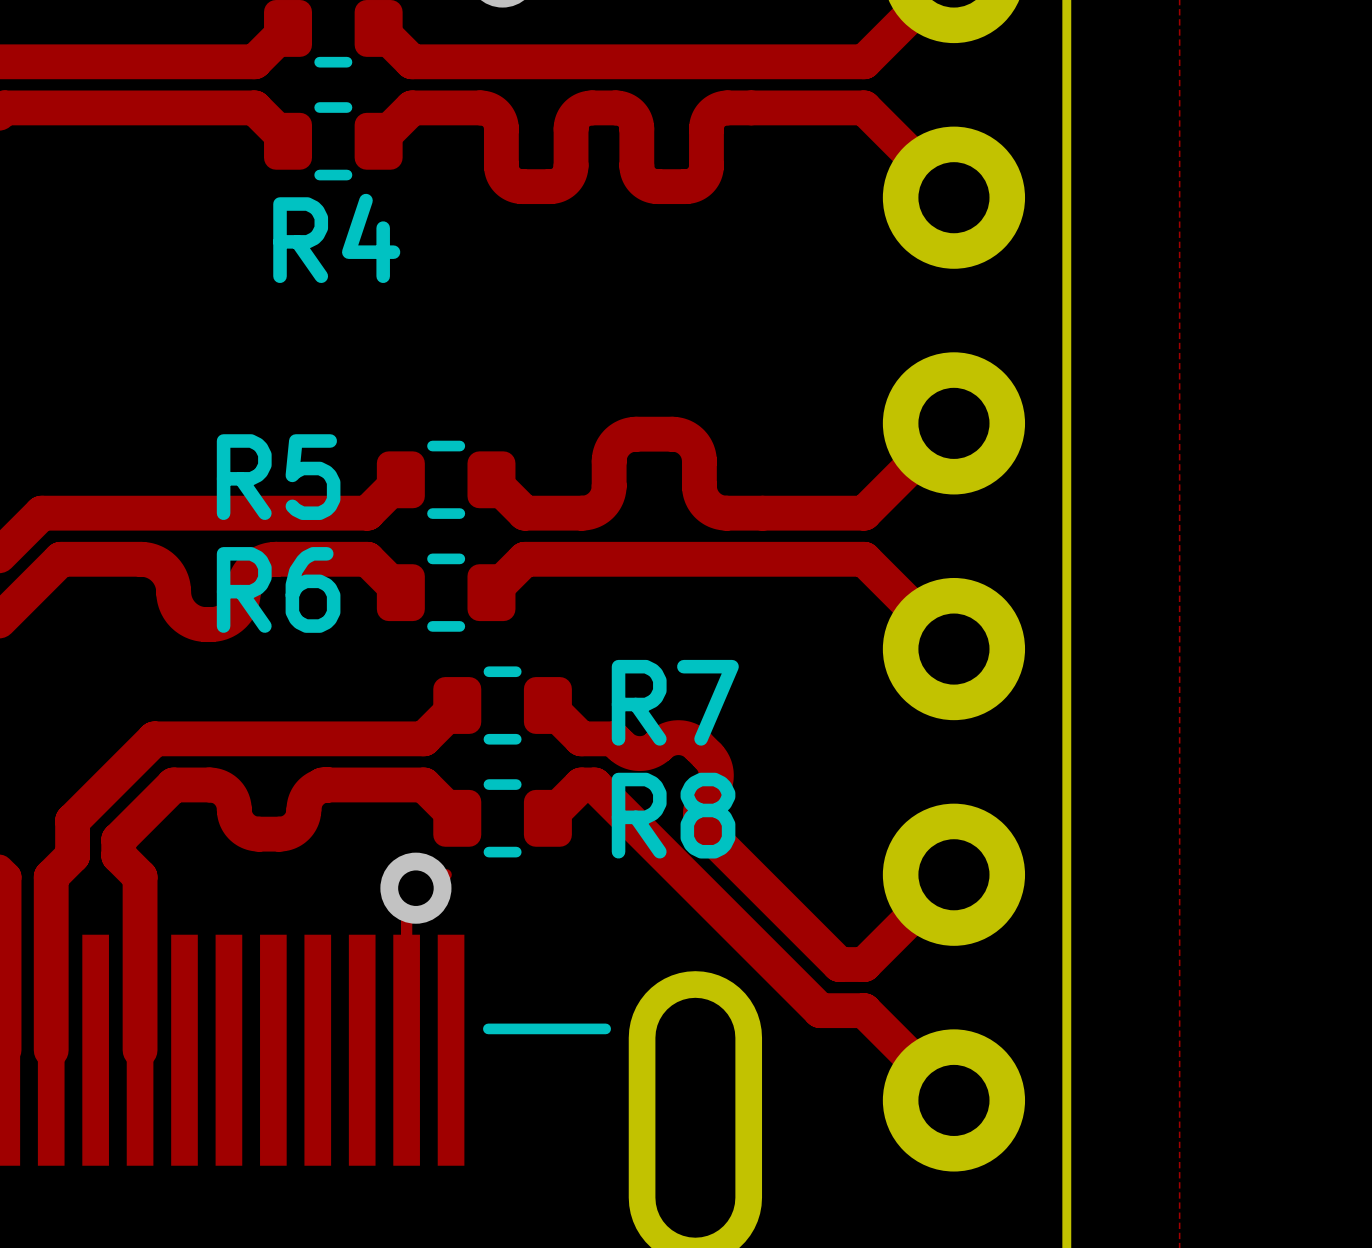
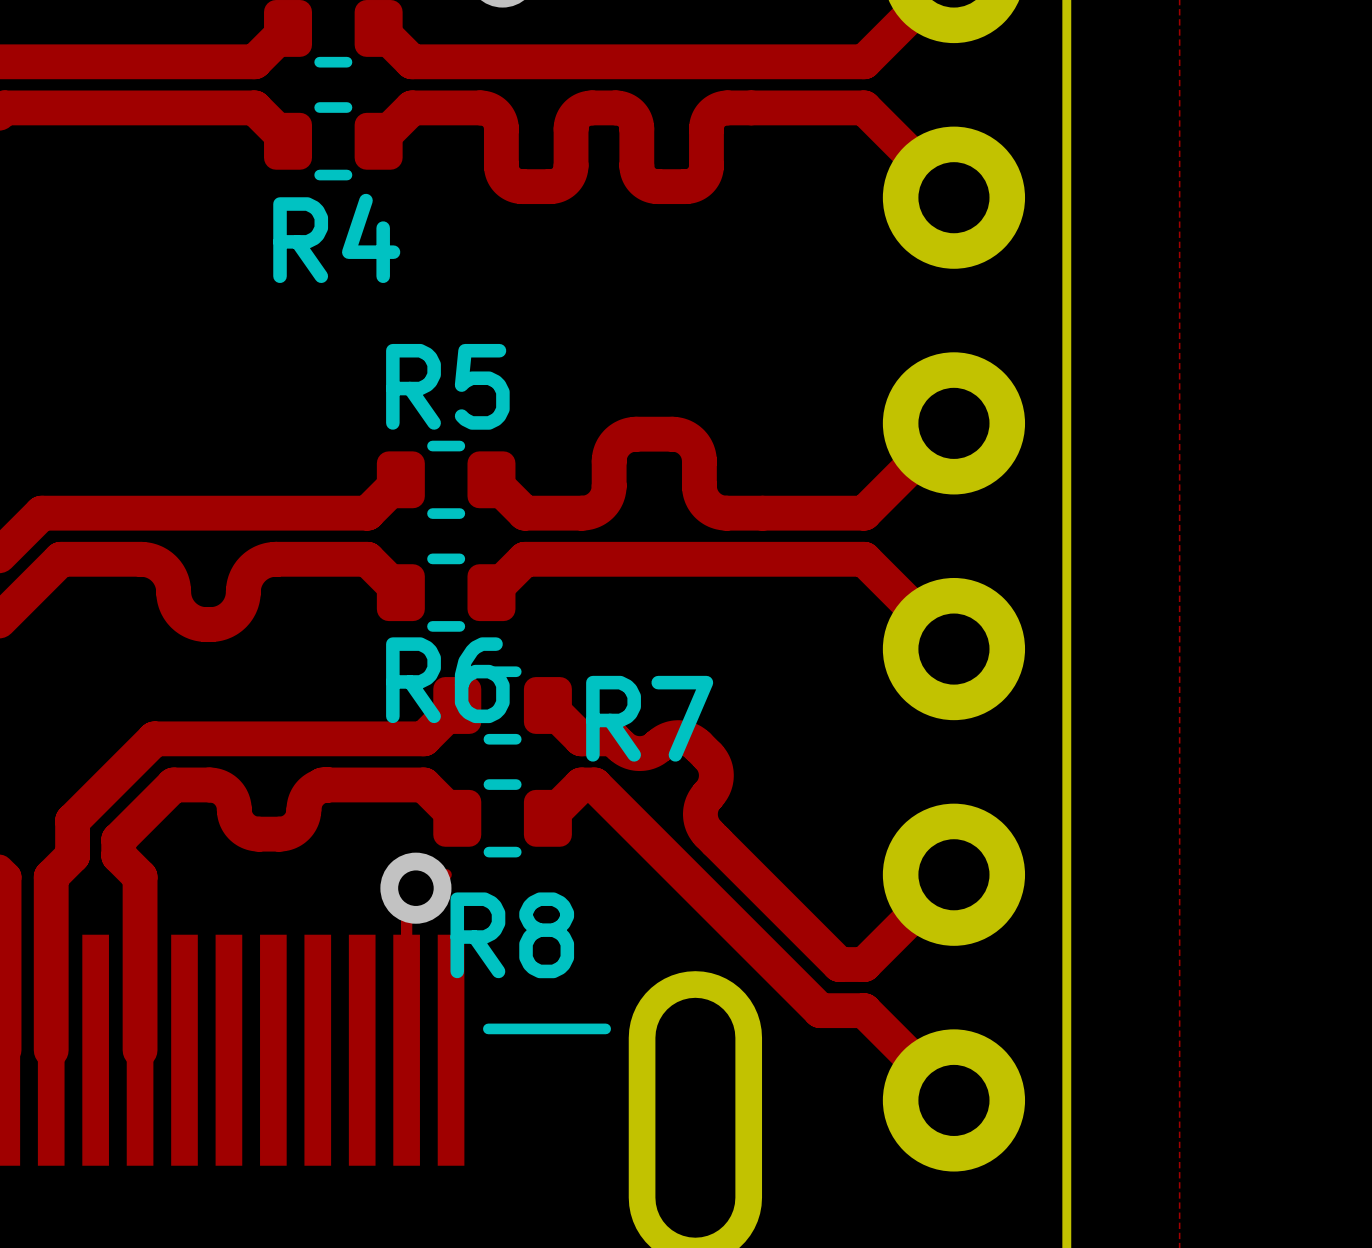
R5 name position: R5 (278, 477) -> R5 (447, 386)
R6 name position: R6 (278, 589) -> R6 (447, 680)
R7 name position: R7 (675, 702) -> R7 (649, 718)
R8 name position: R8 (673, 815) -> R8 (512, 935)

